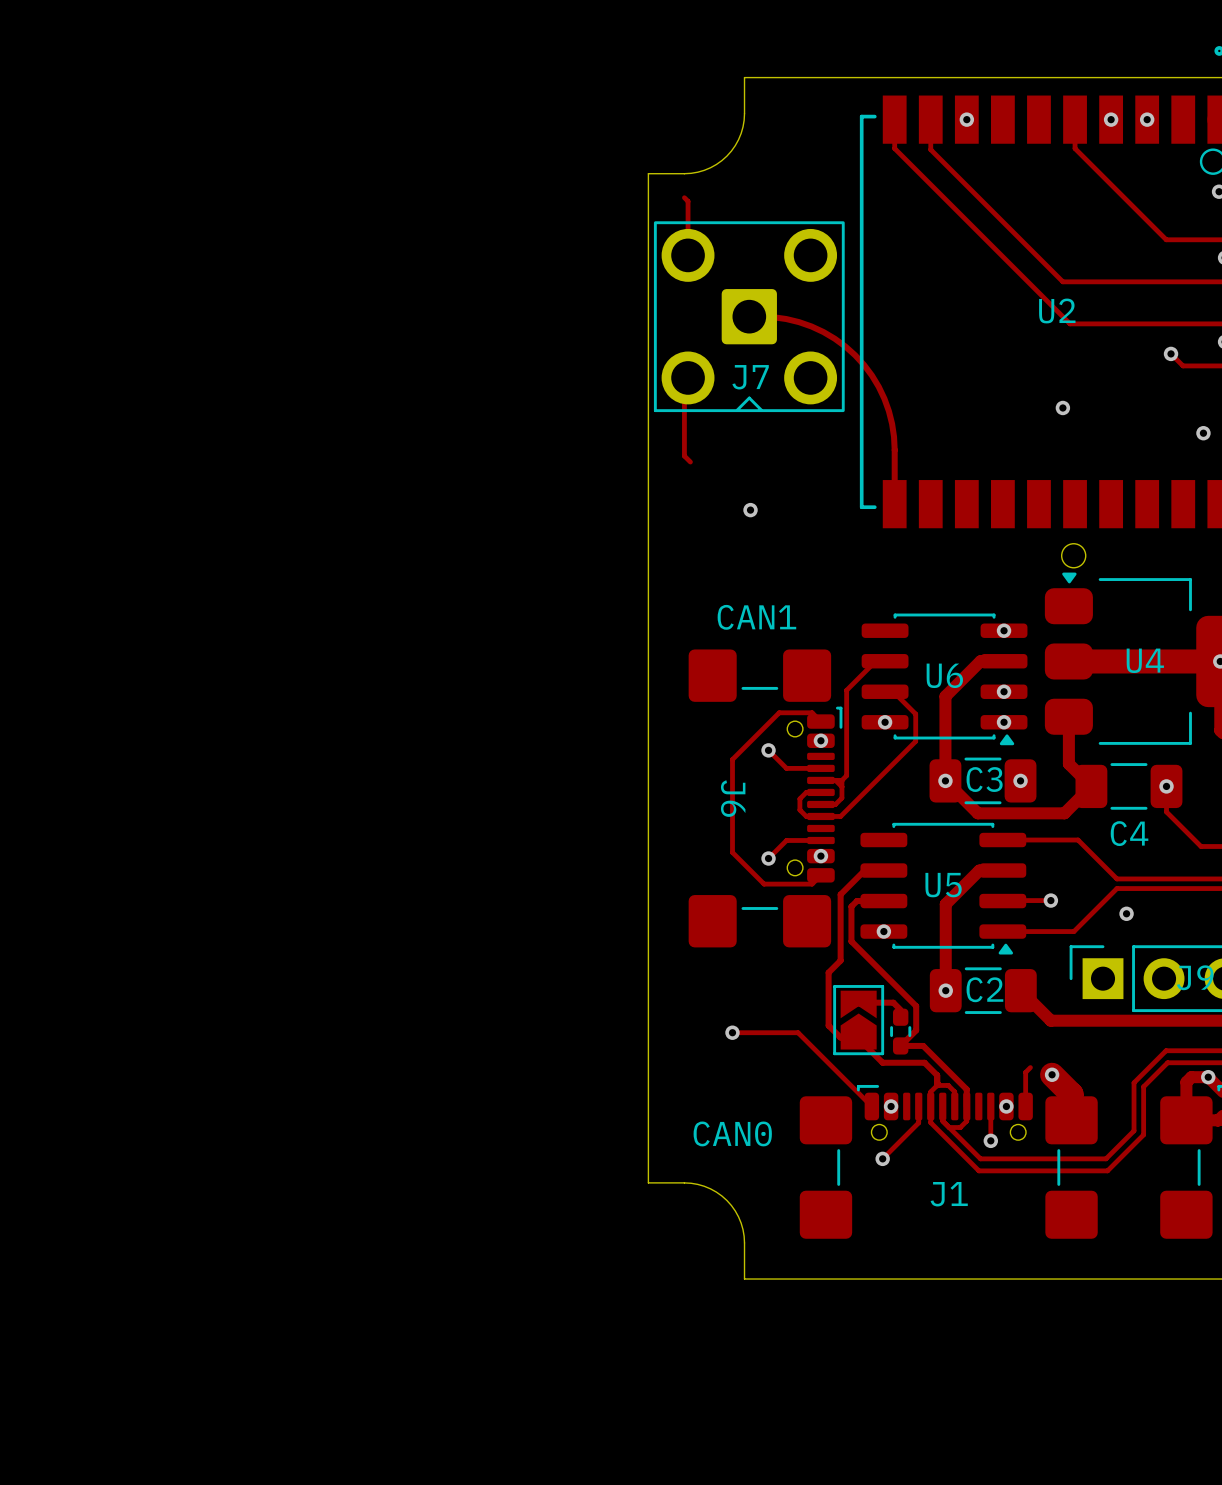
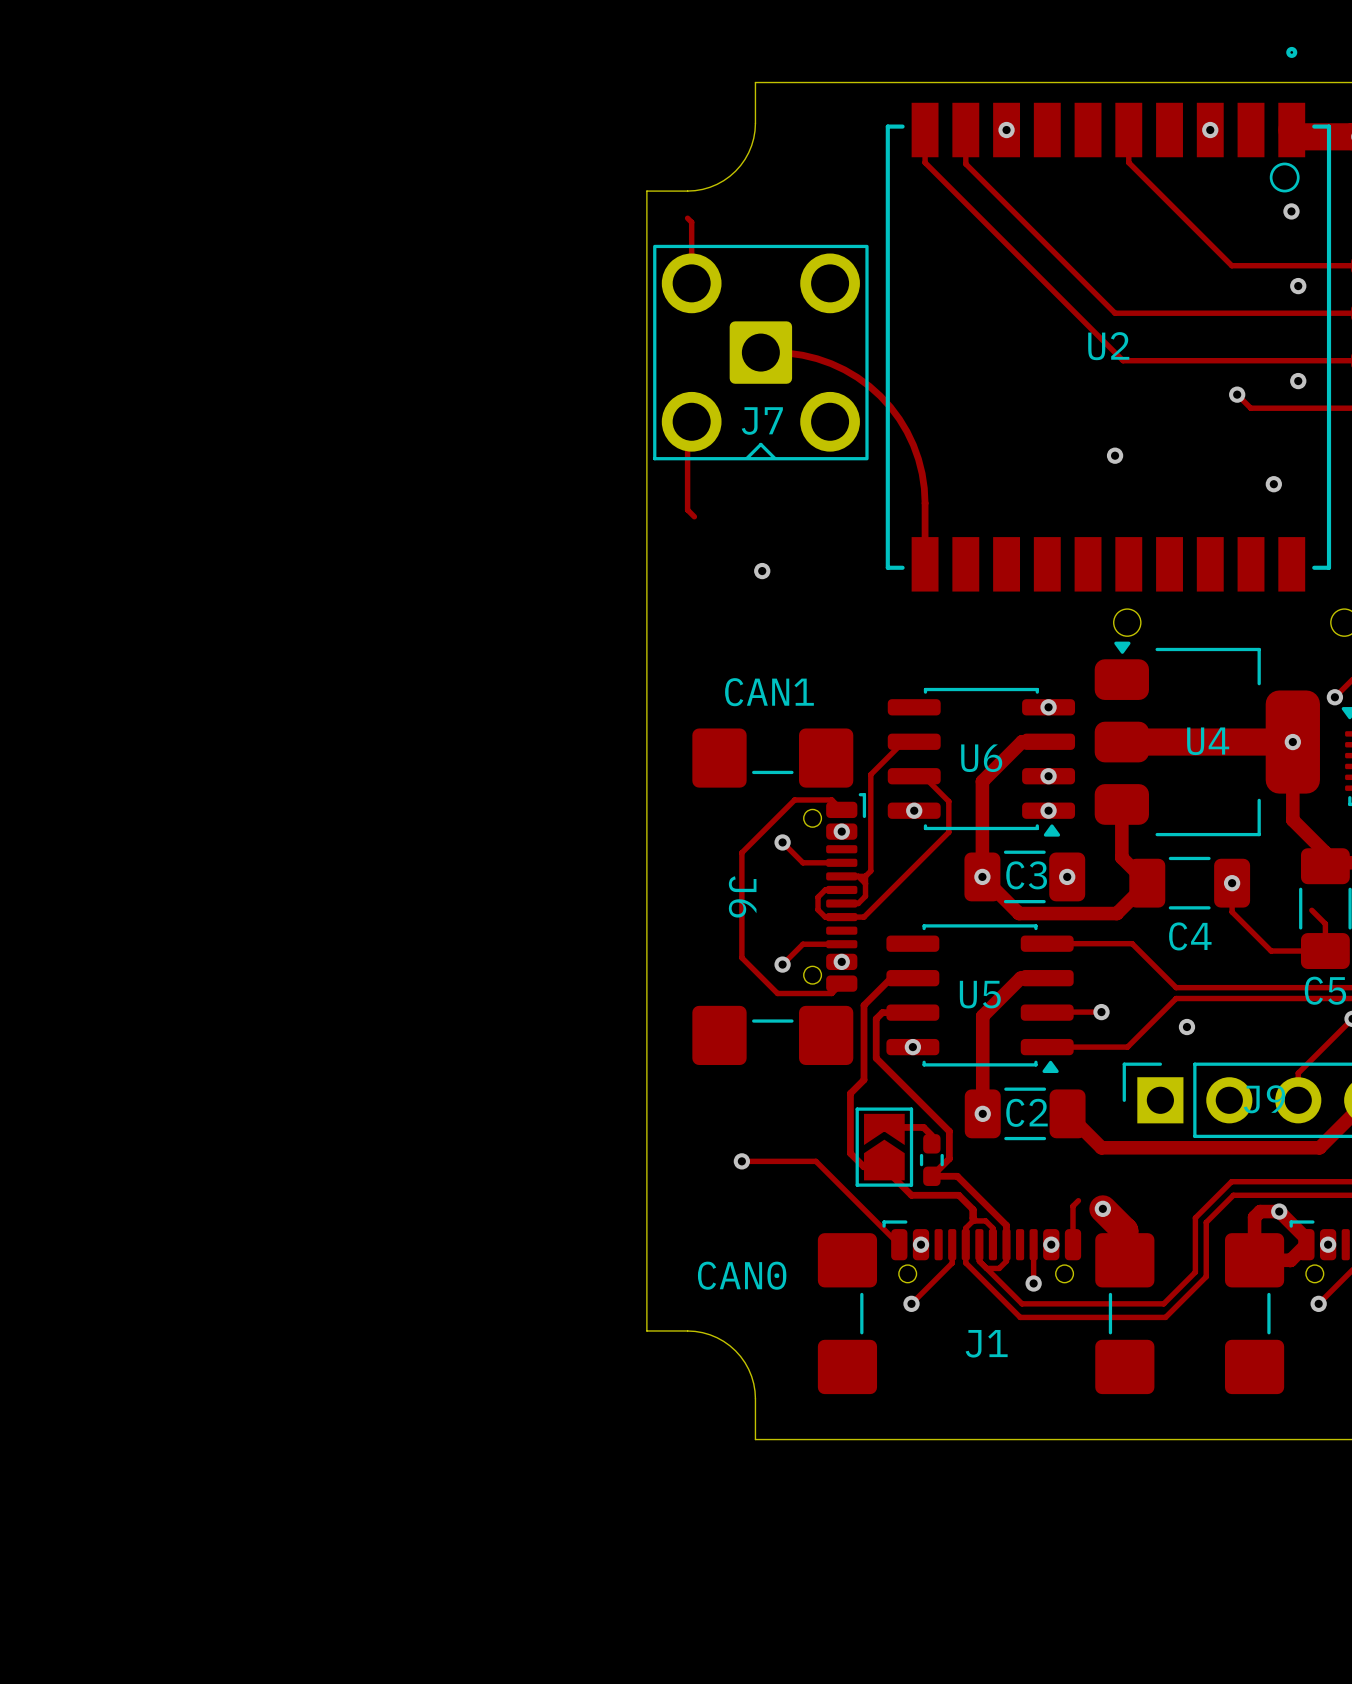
via: (1111, 119) -> none

